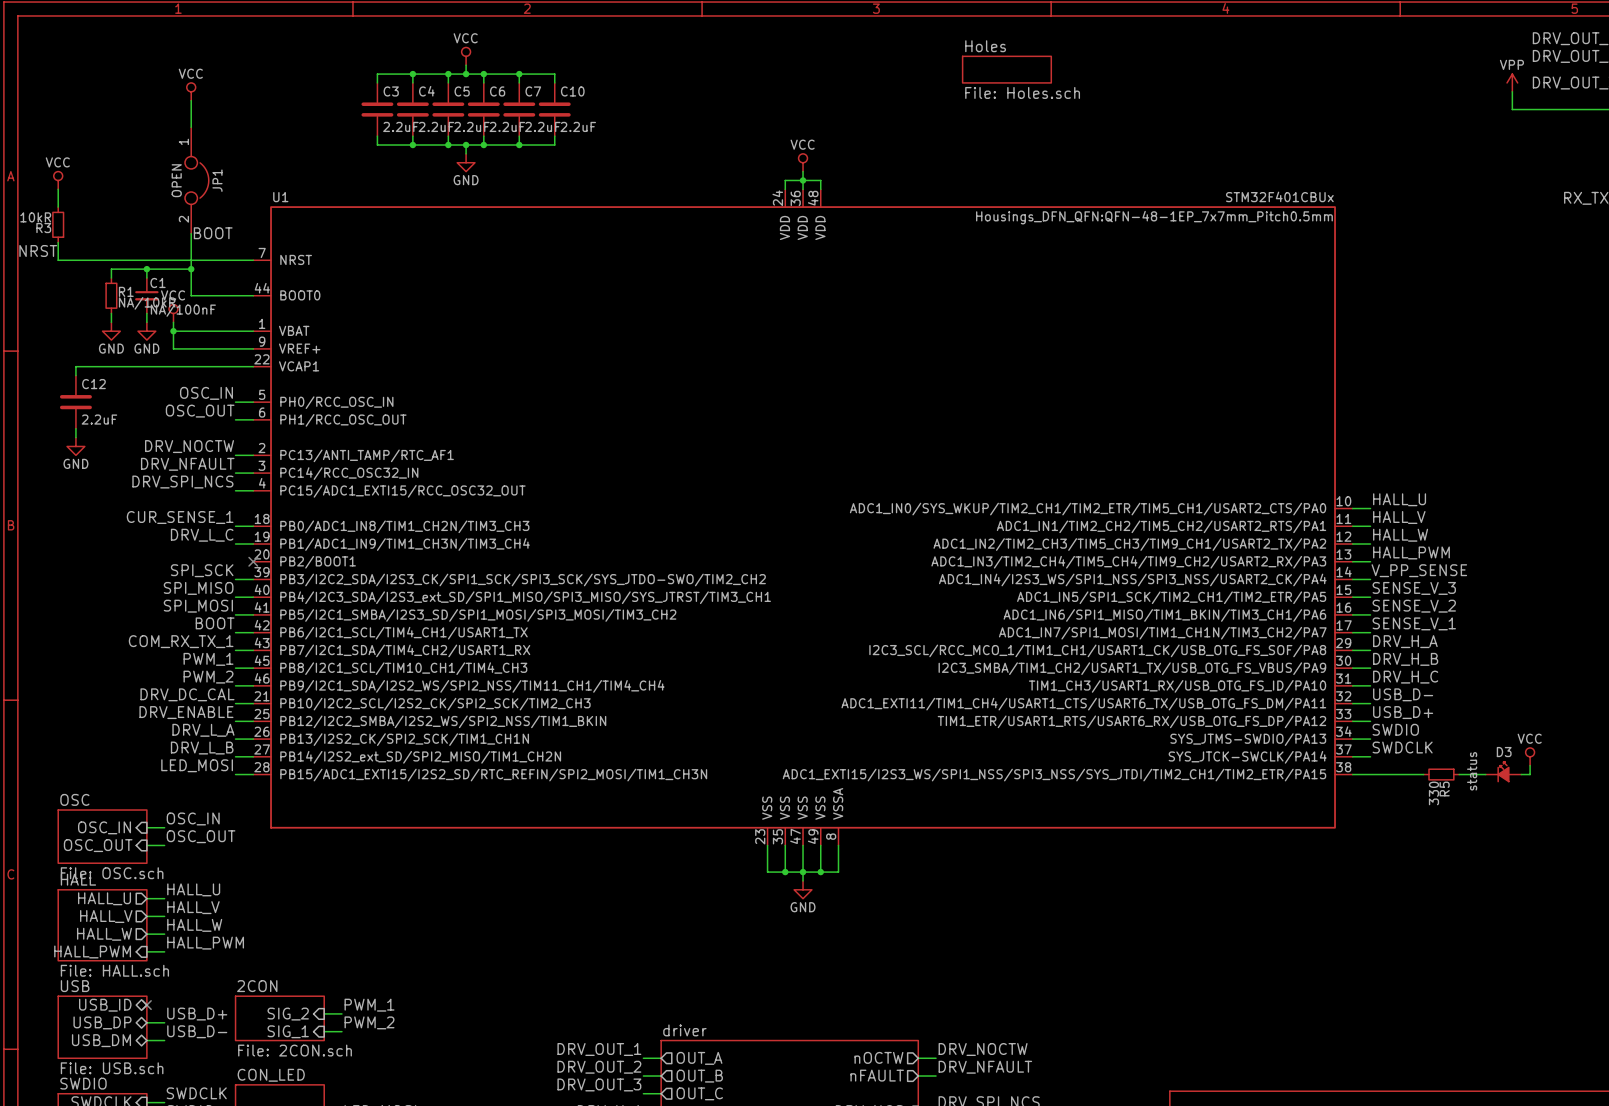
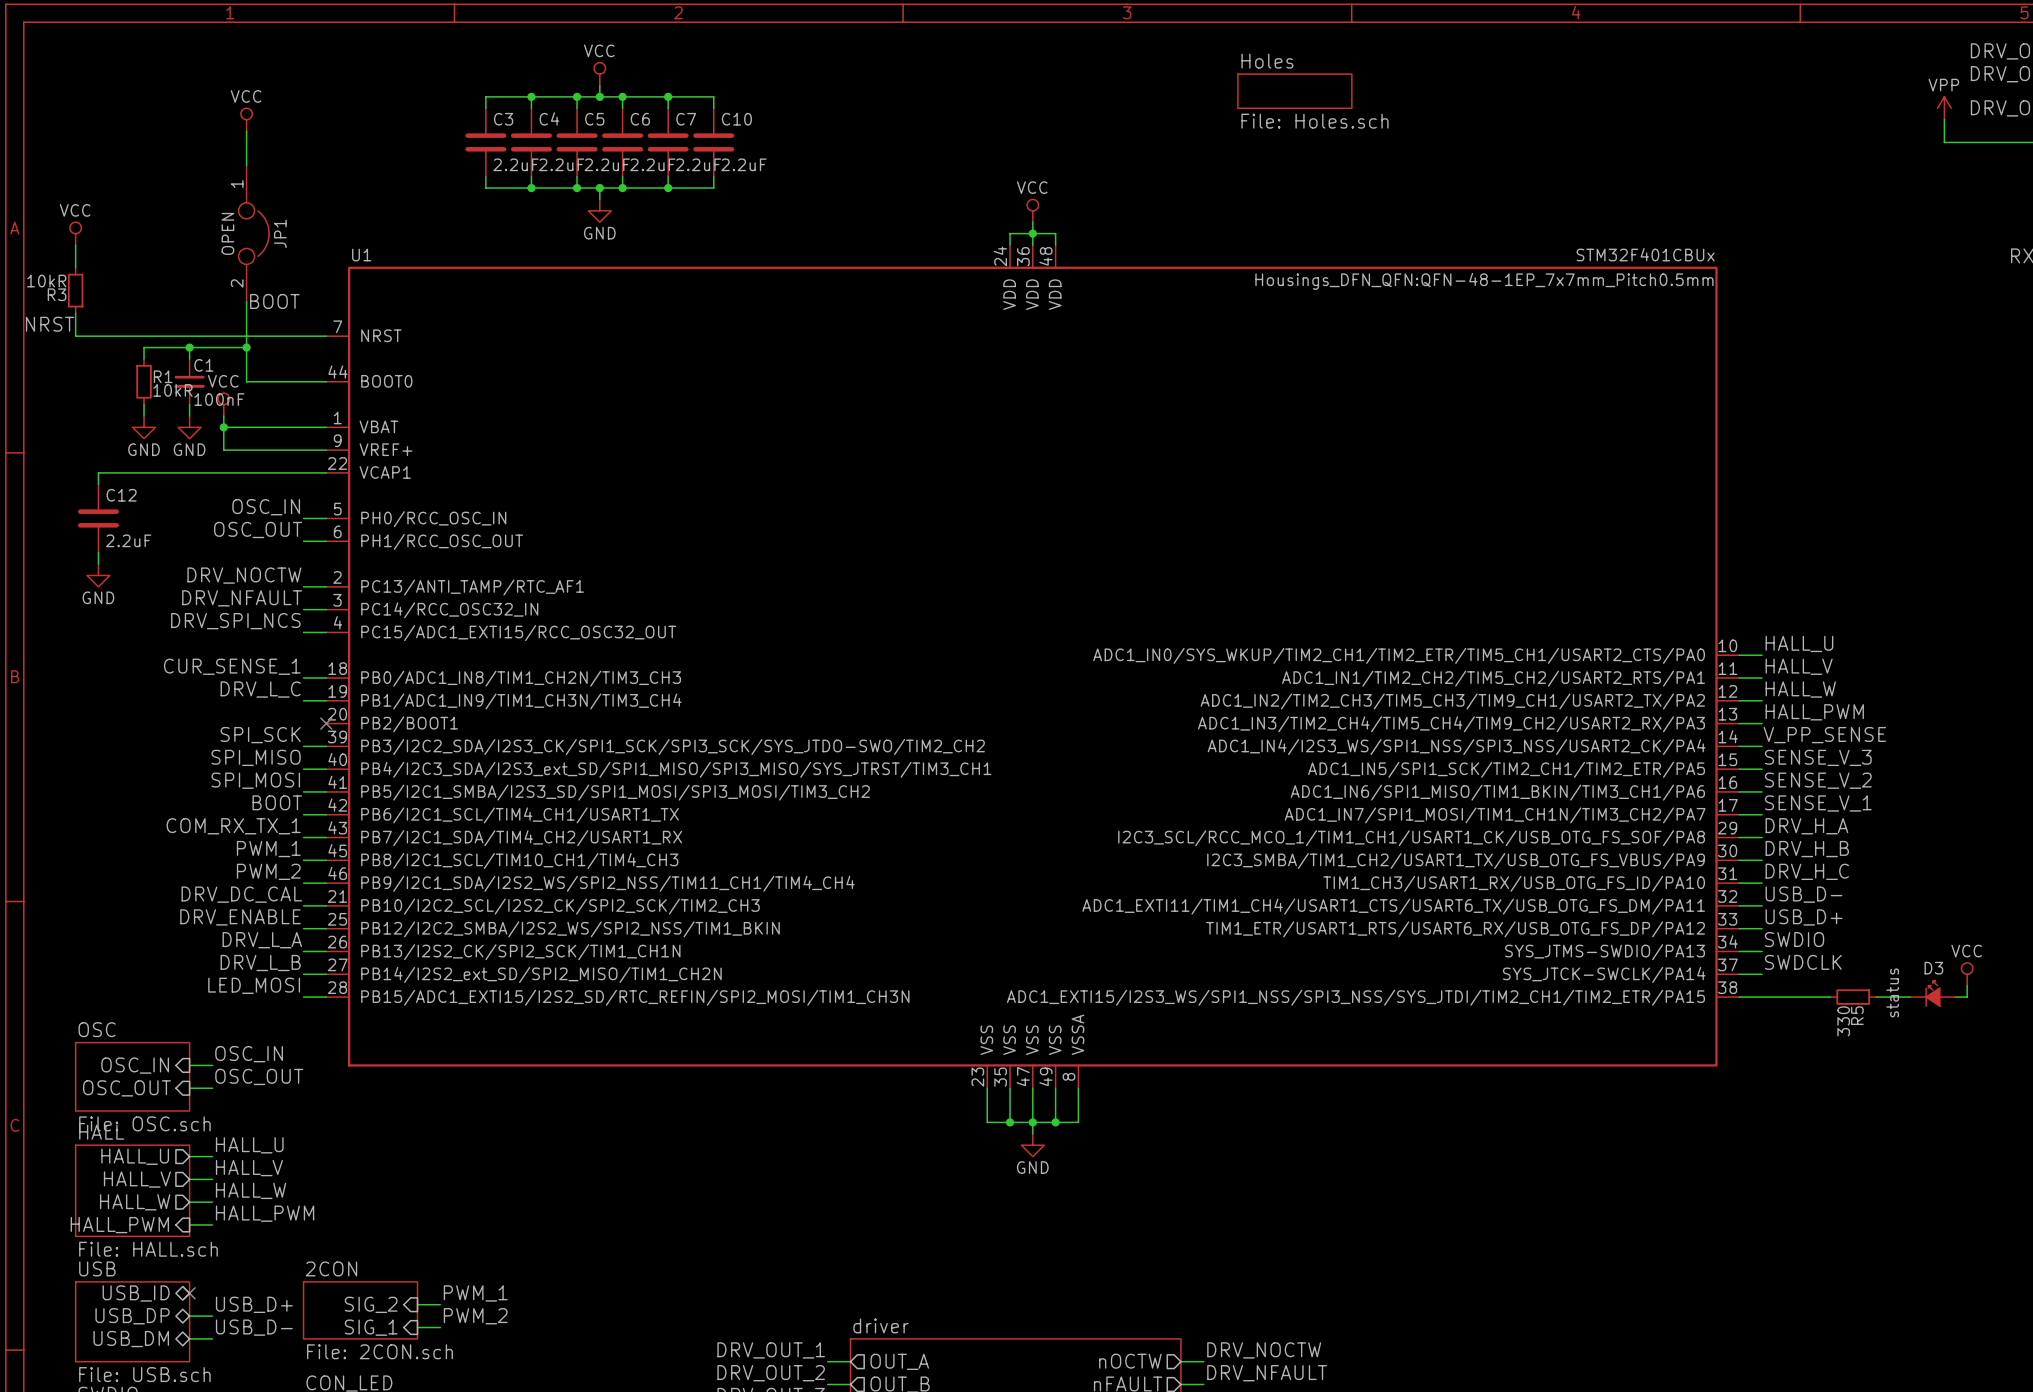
R1 value: NA/10kR (147, 303) -> 10kR (172, 390)
C1 value: NA/100nF (183, 310) -> 100nF (219, 399)

